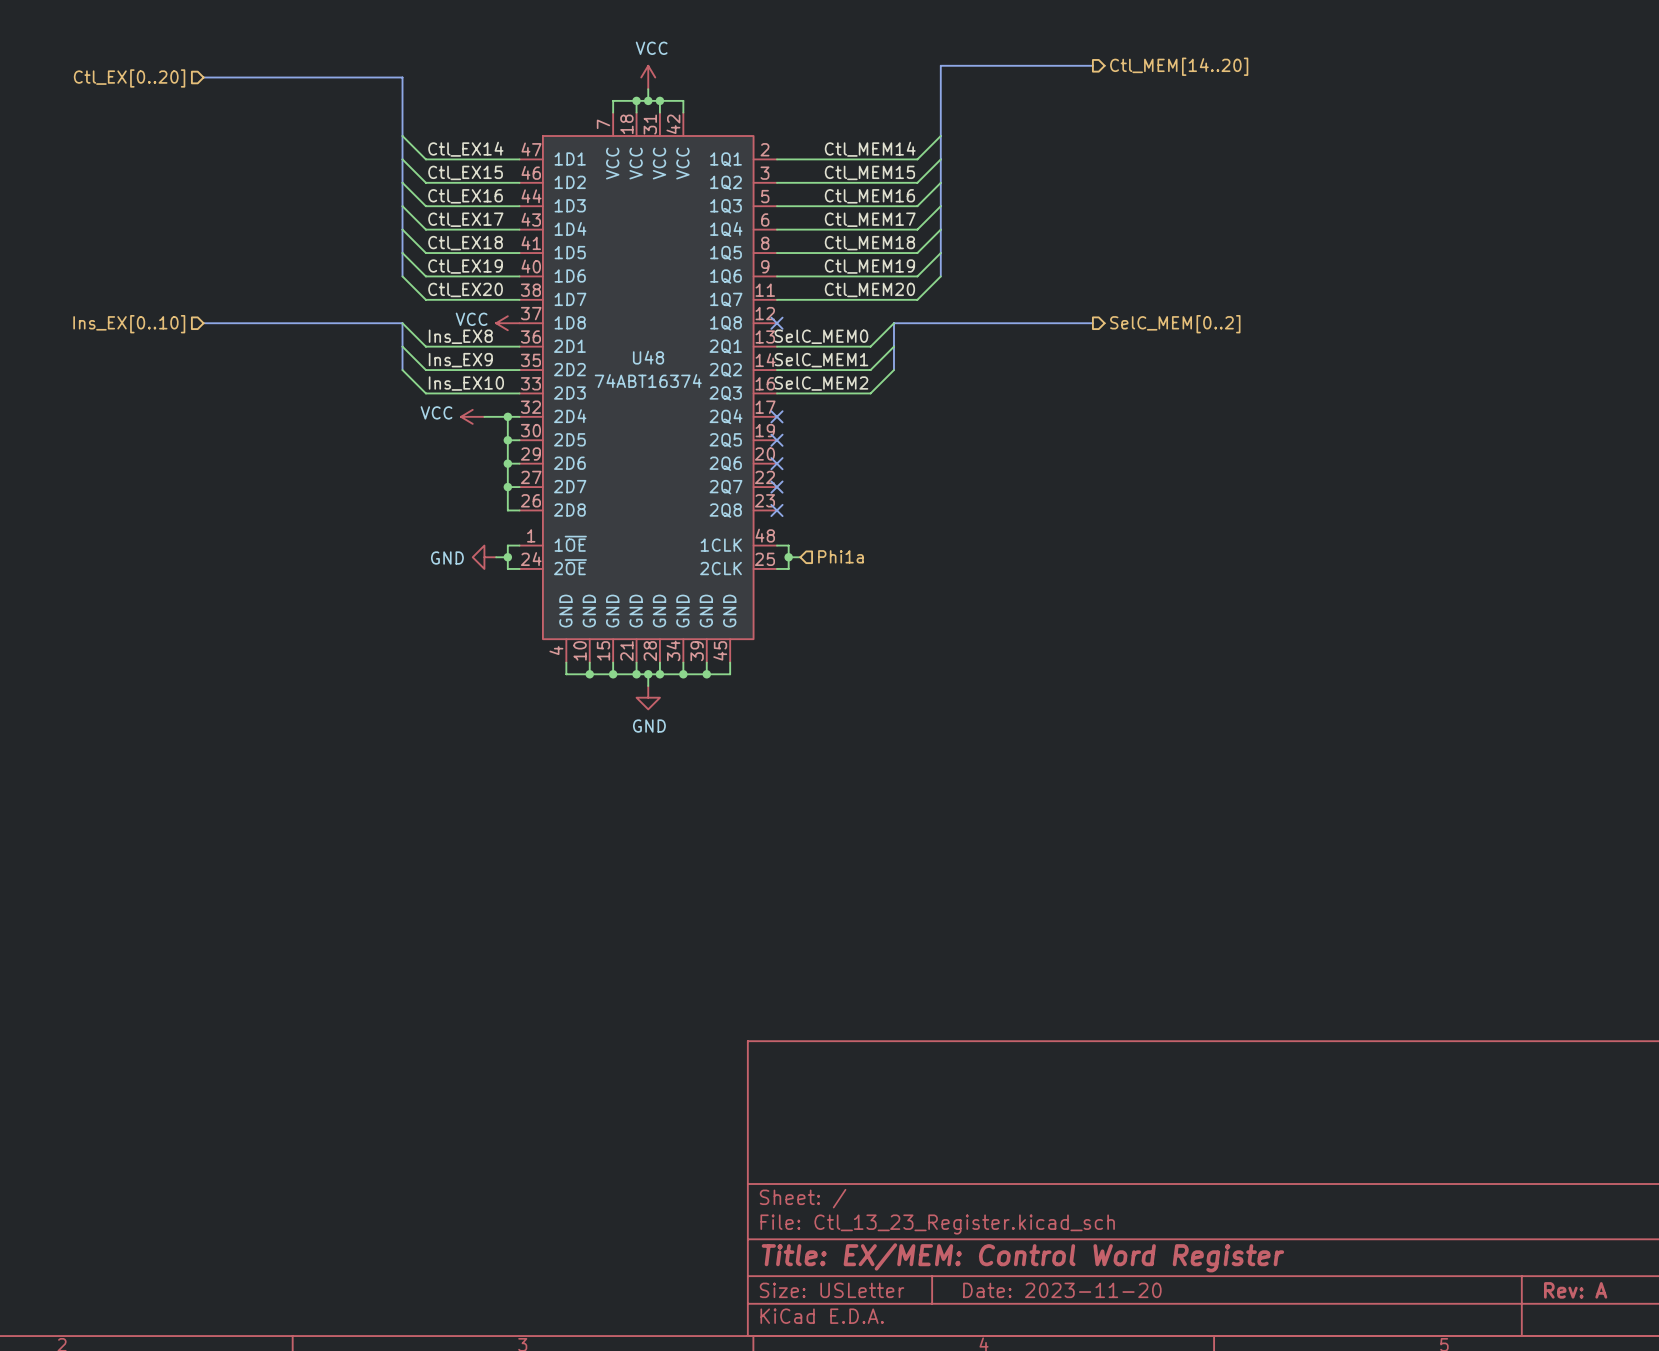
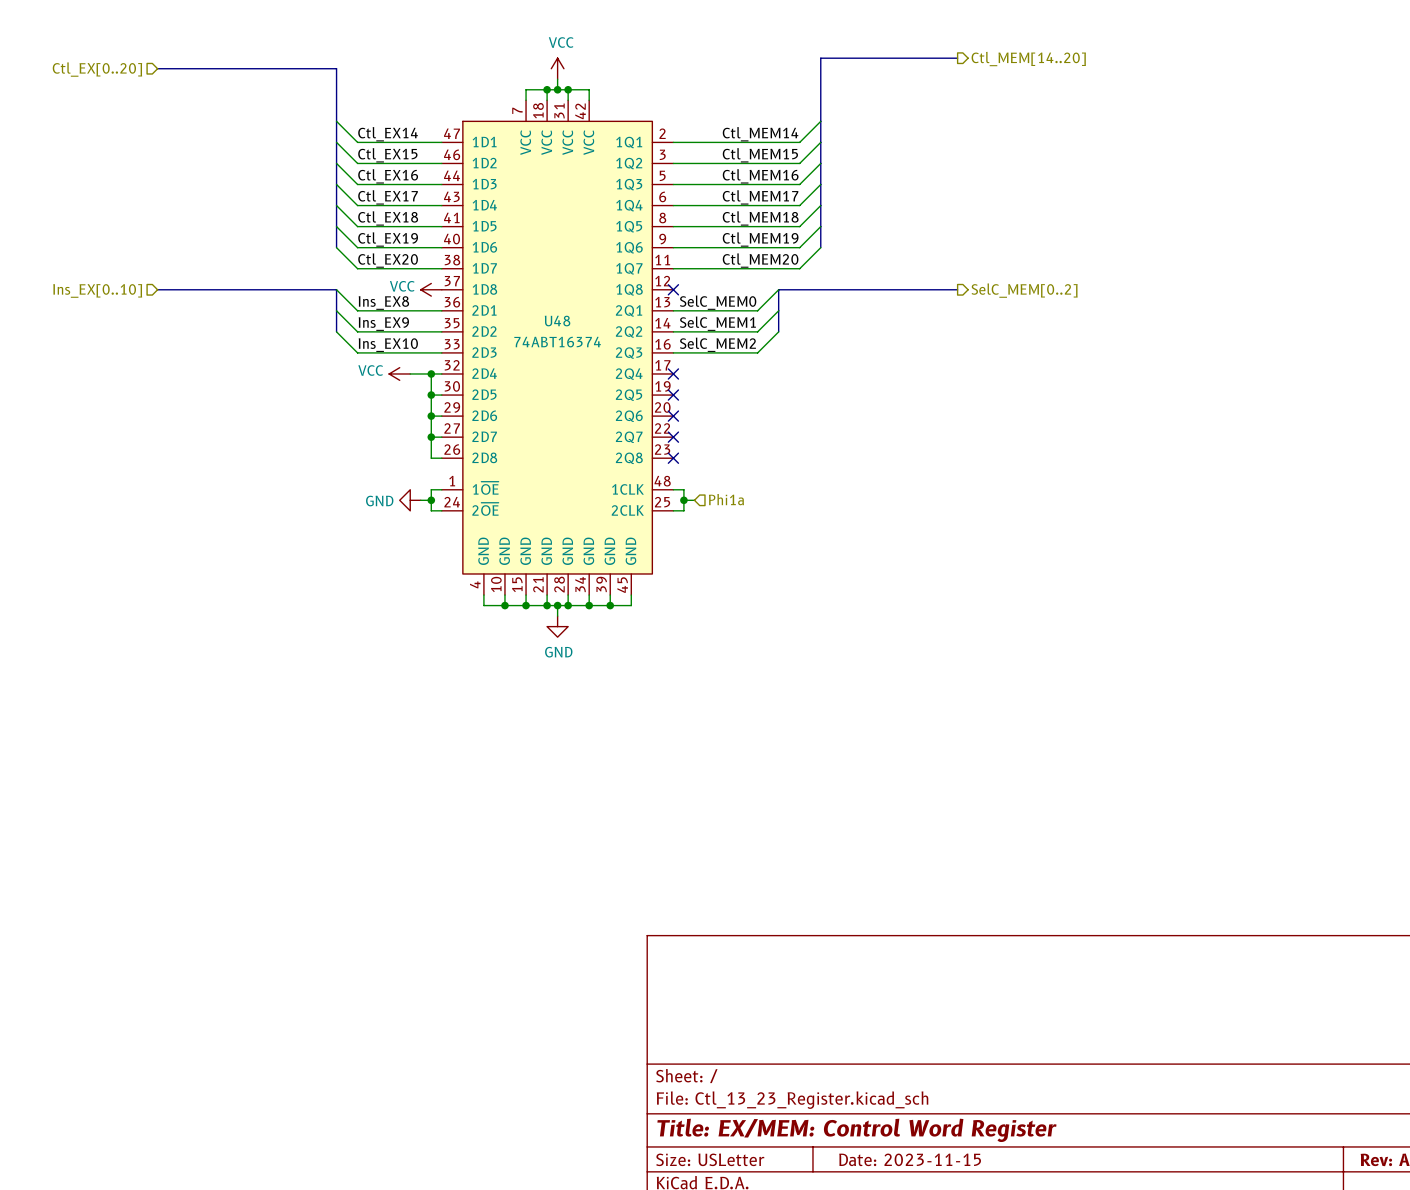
title block: Date: 2023-11-20 (1062, 1290) -> Date: 2023-11-15 (910, 1159)

